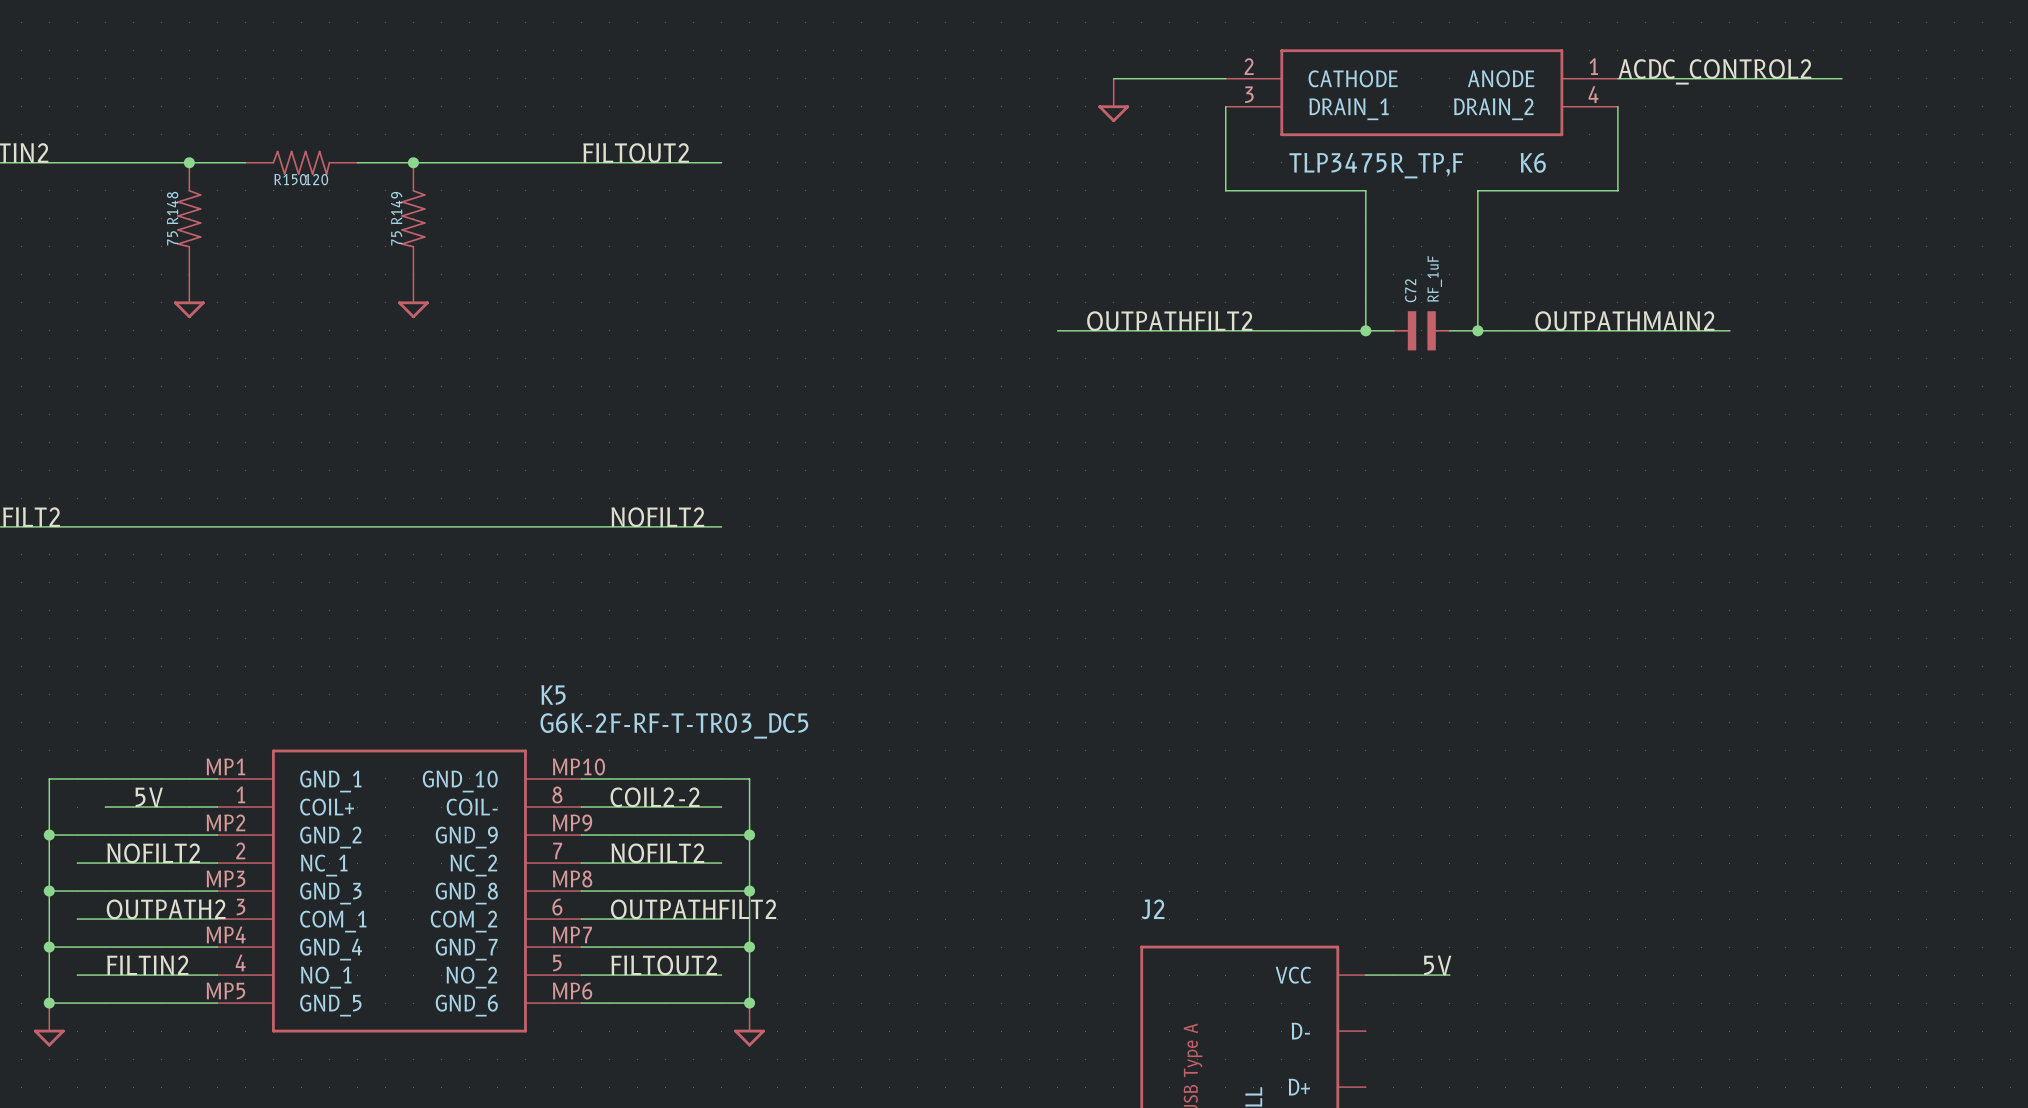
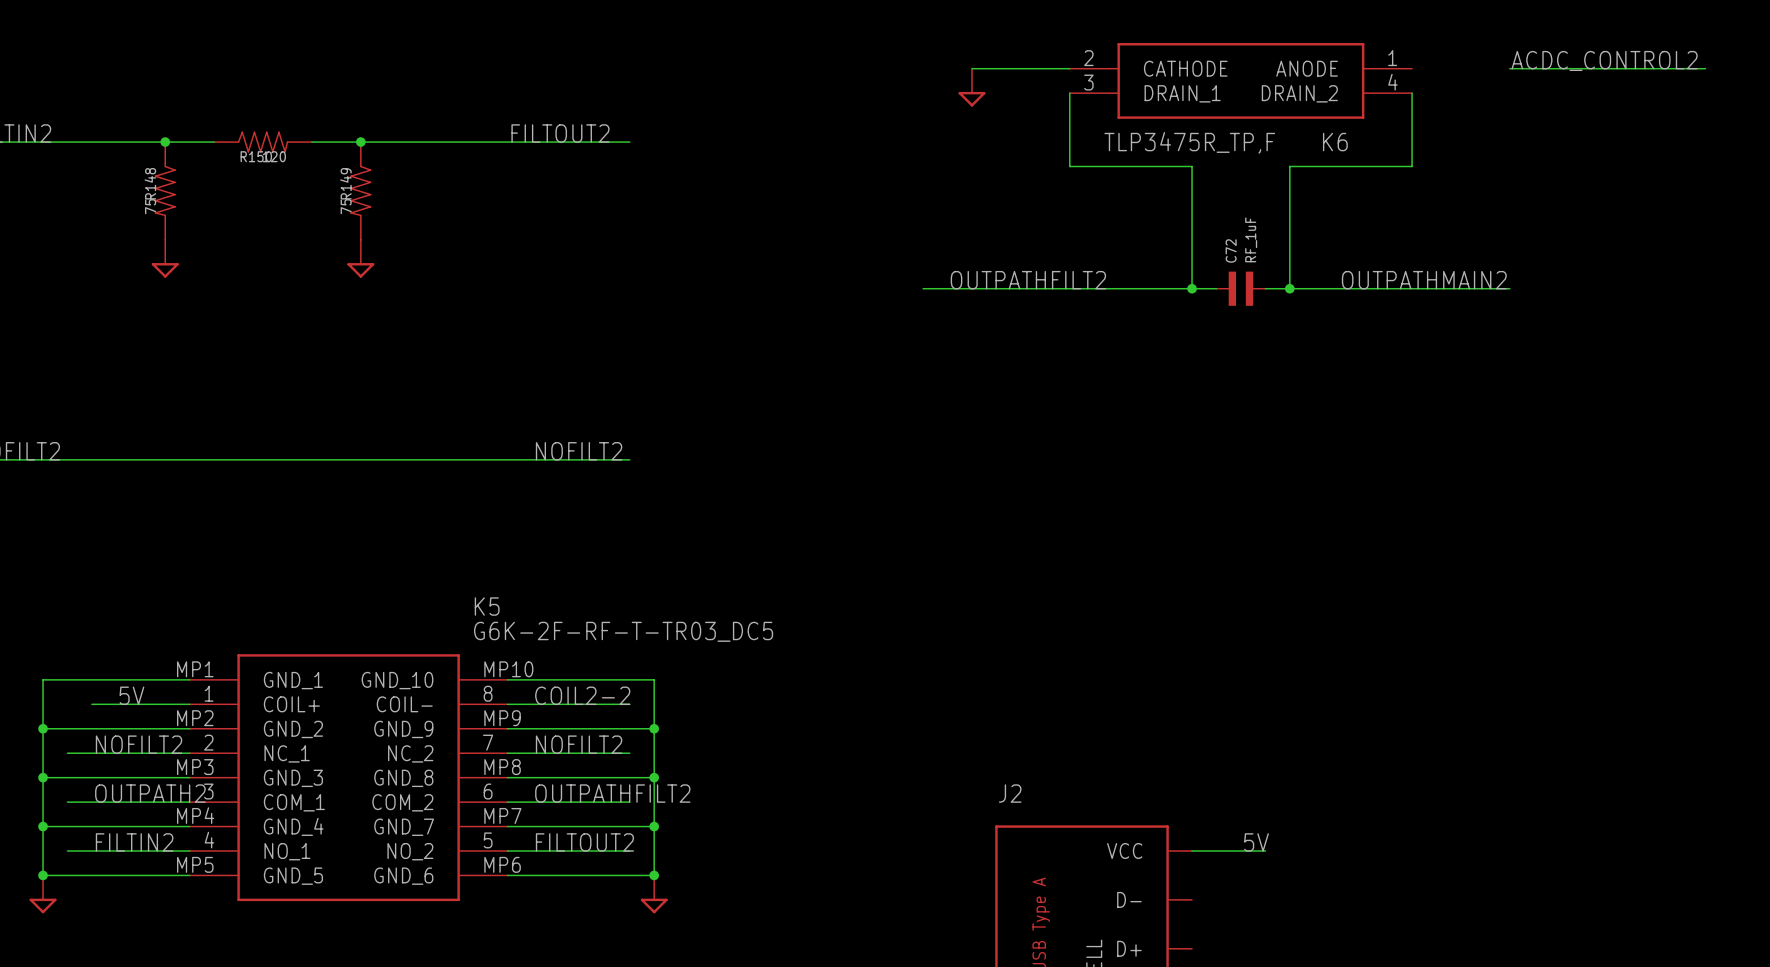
label position: ACDC_CONTROL2 (1714, 71) -> ACDC_CONTROL2 (1604, 60)
wire: (1617, 78) (1729, 78) -> (1607, 68) (1705, 68)

